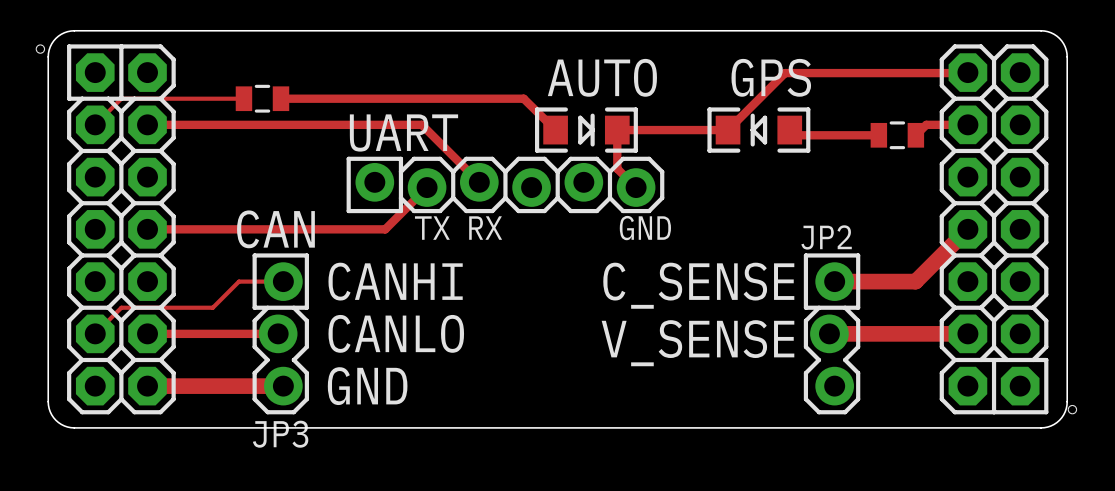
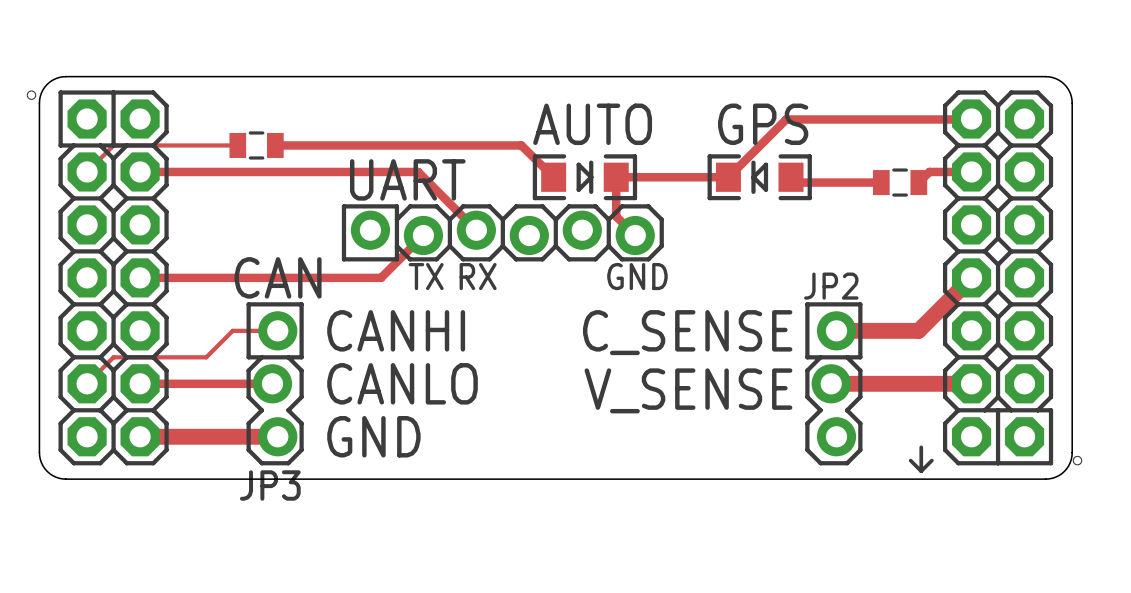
line: none -> (921, 447) (921, 471)
line: none -> (910, 460) (921, 471)
line: none -> (931, 460) (921, 471)

